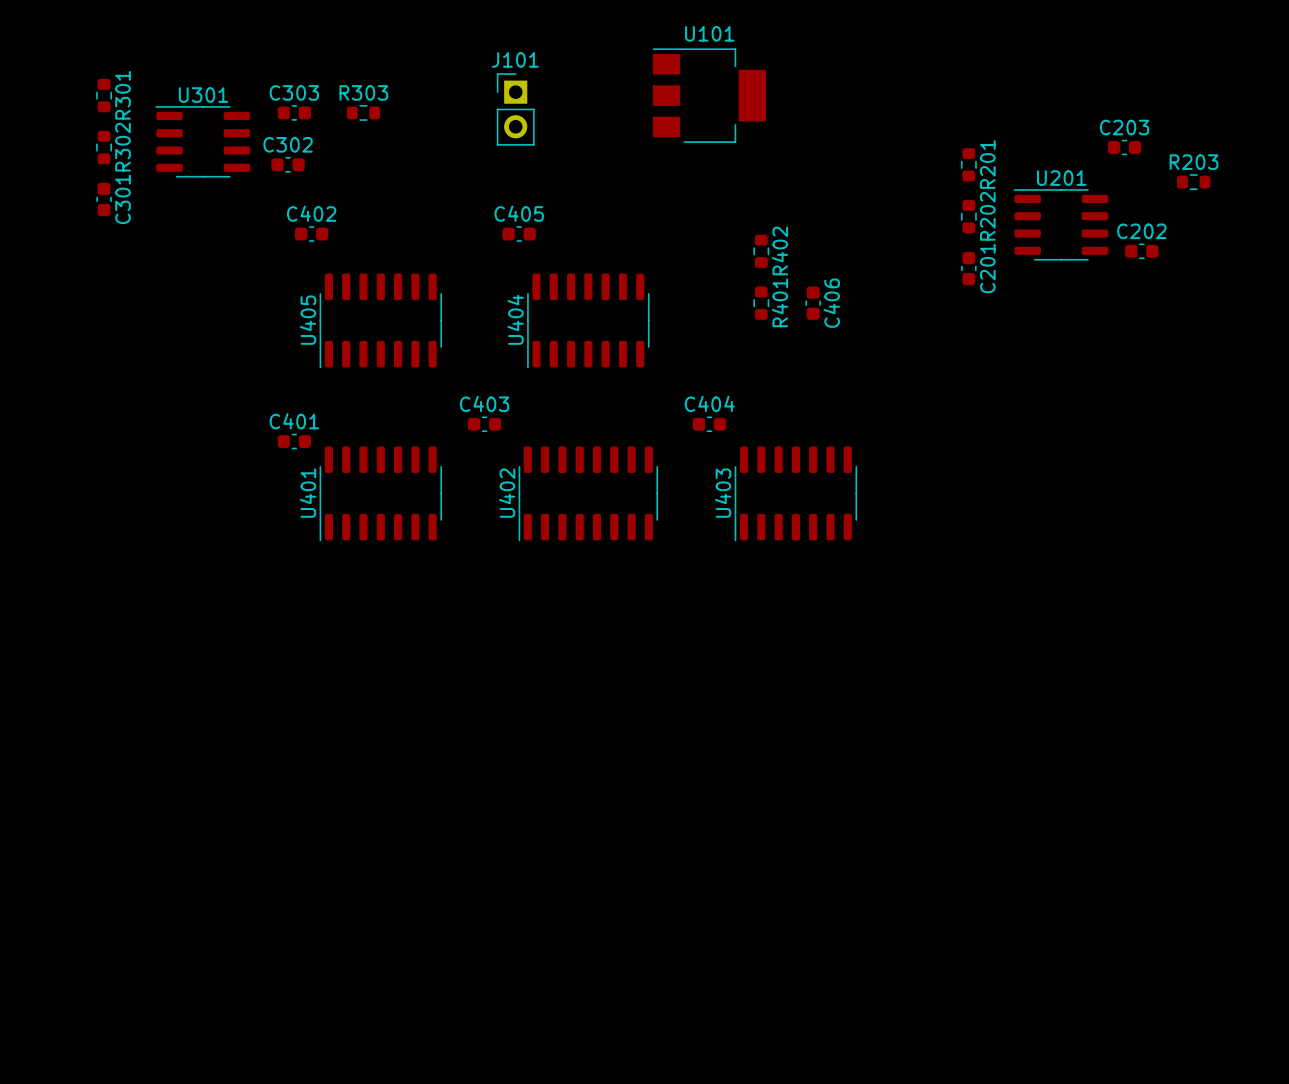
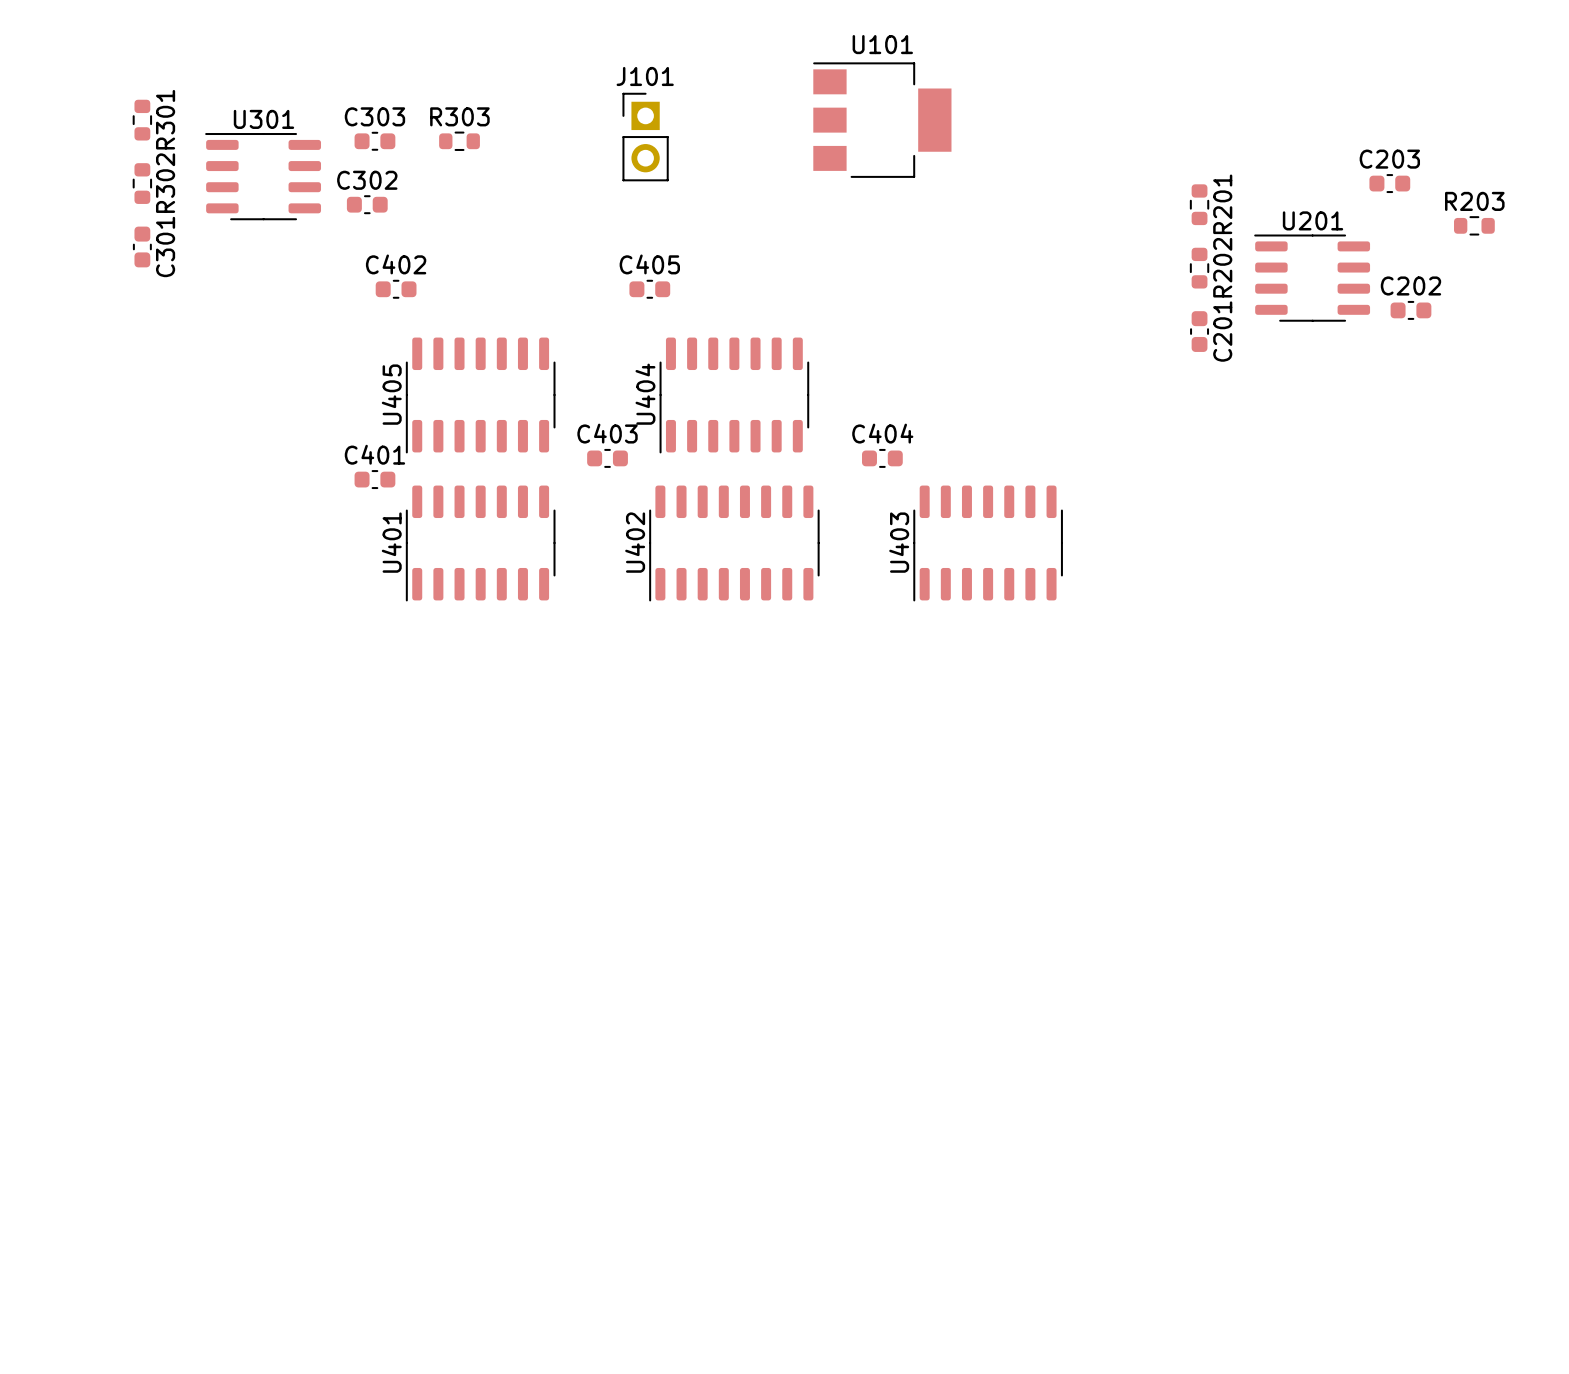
R402: (761, 251) -> none
R401: (761, 303) -> none
C406: (813, 303) -> none
C403 position: (484, 424) -> (607, 458)
C404 position: (709, 424) -> (882, 458)
C401 position: (294, 441) -> (374, 479)
U401 position: (380, 493) -> (480, 543)
U402 position: (588, 493) -> (734, 543)
U403 position: (795, 493) -> (988, 543)

